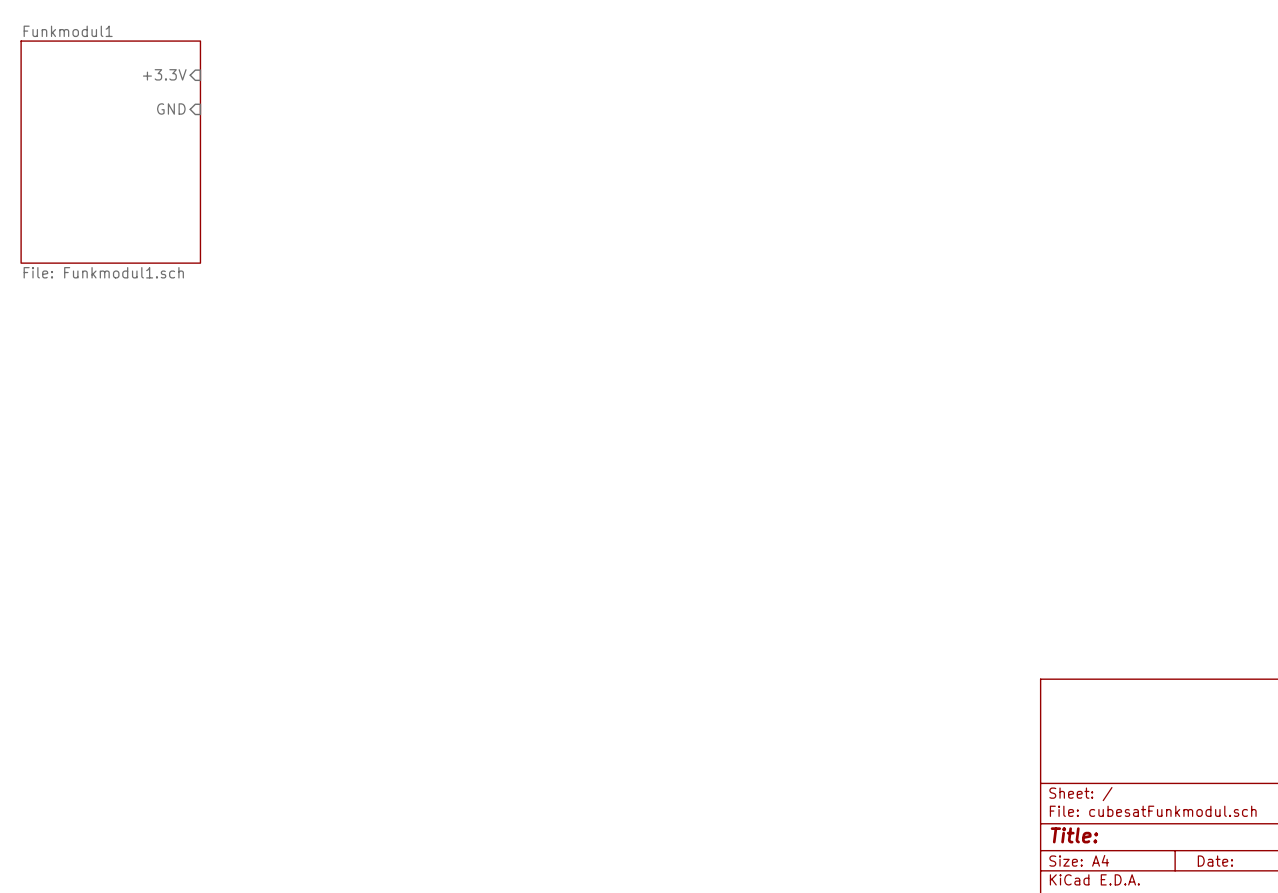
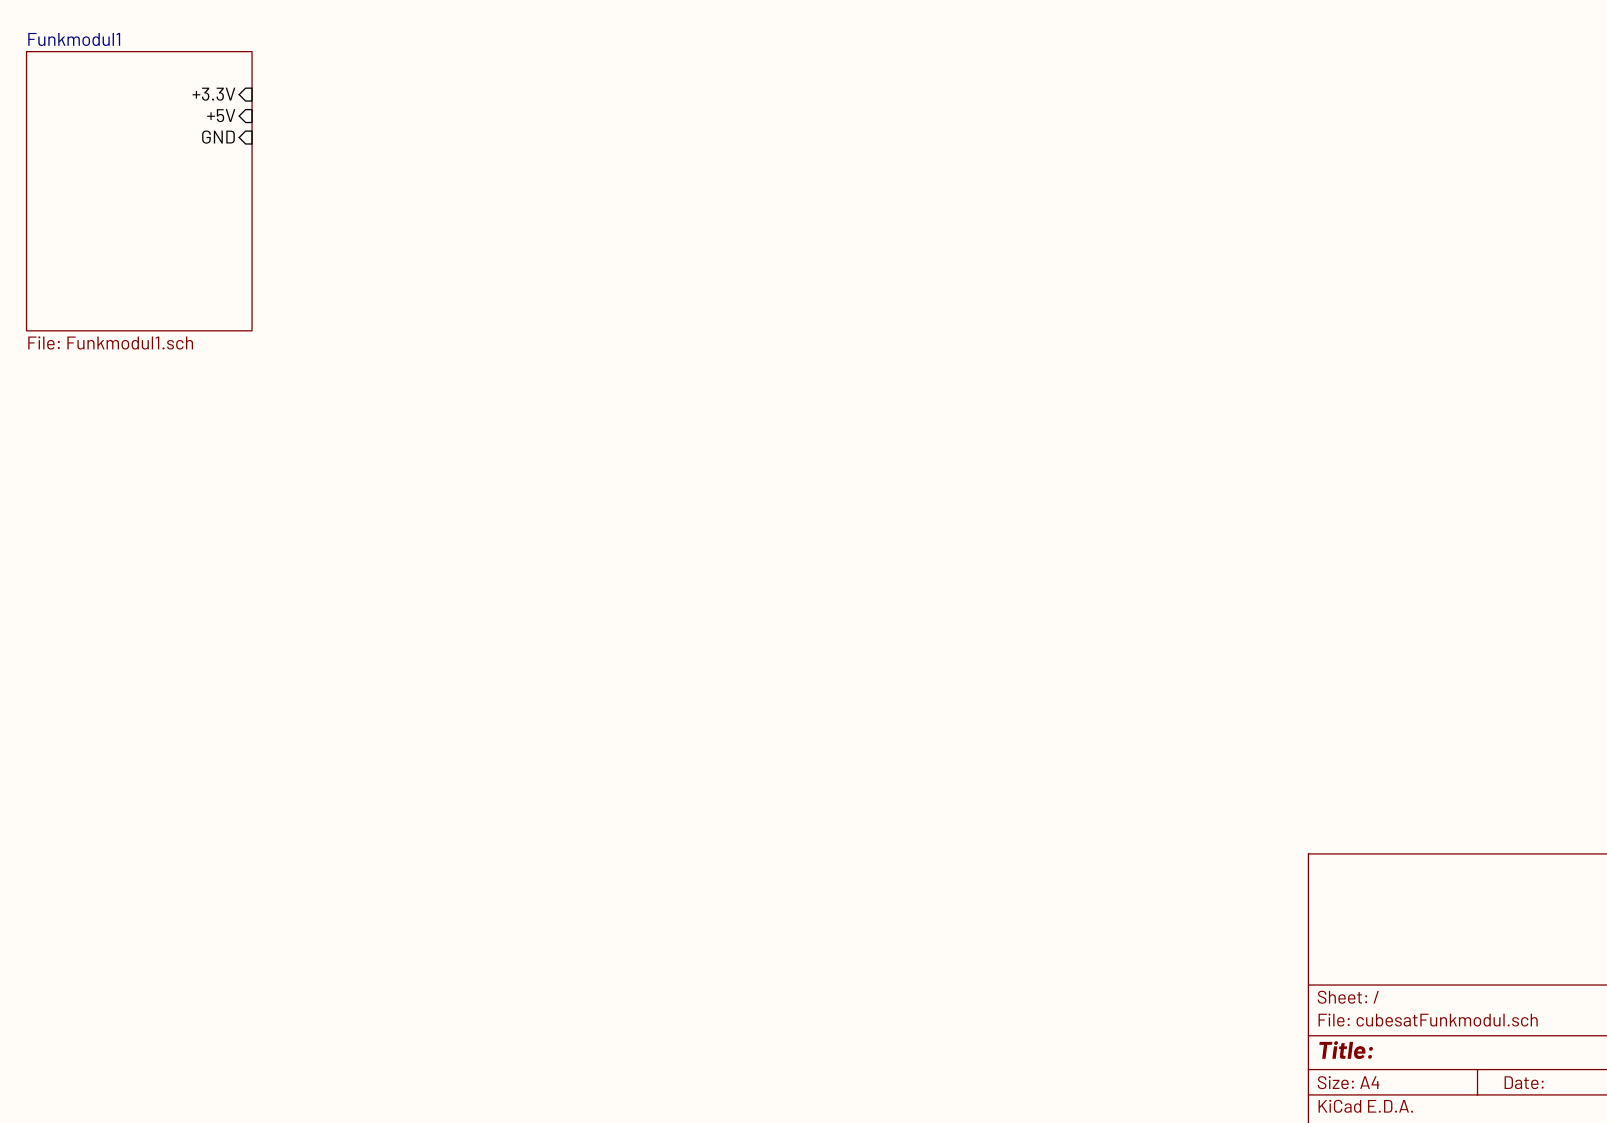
sheet pin: none -> +5V (221, 115)

